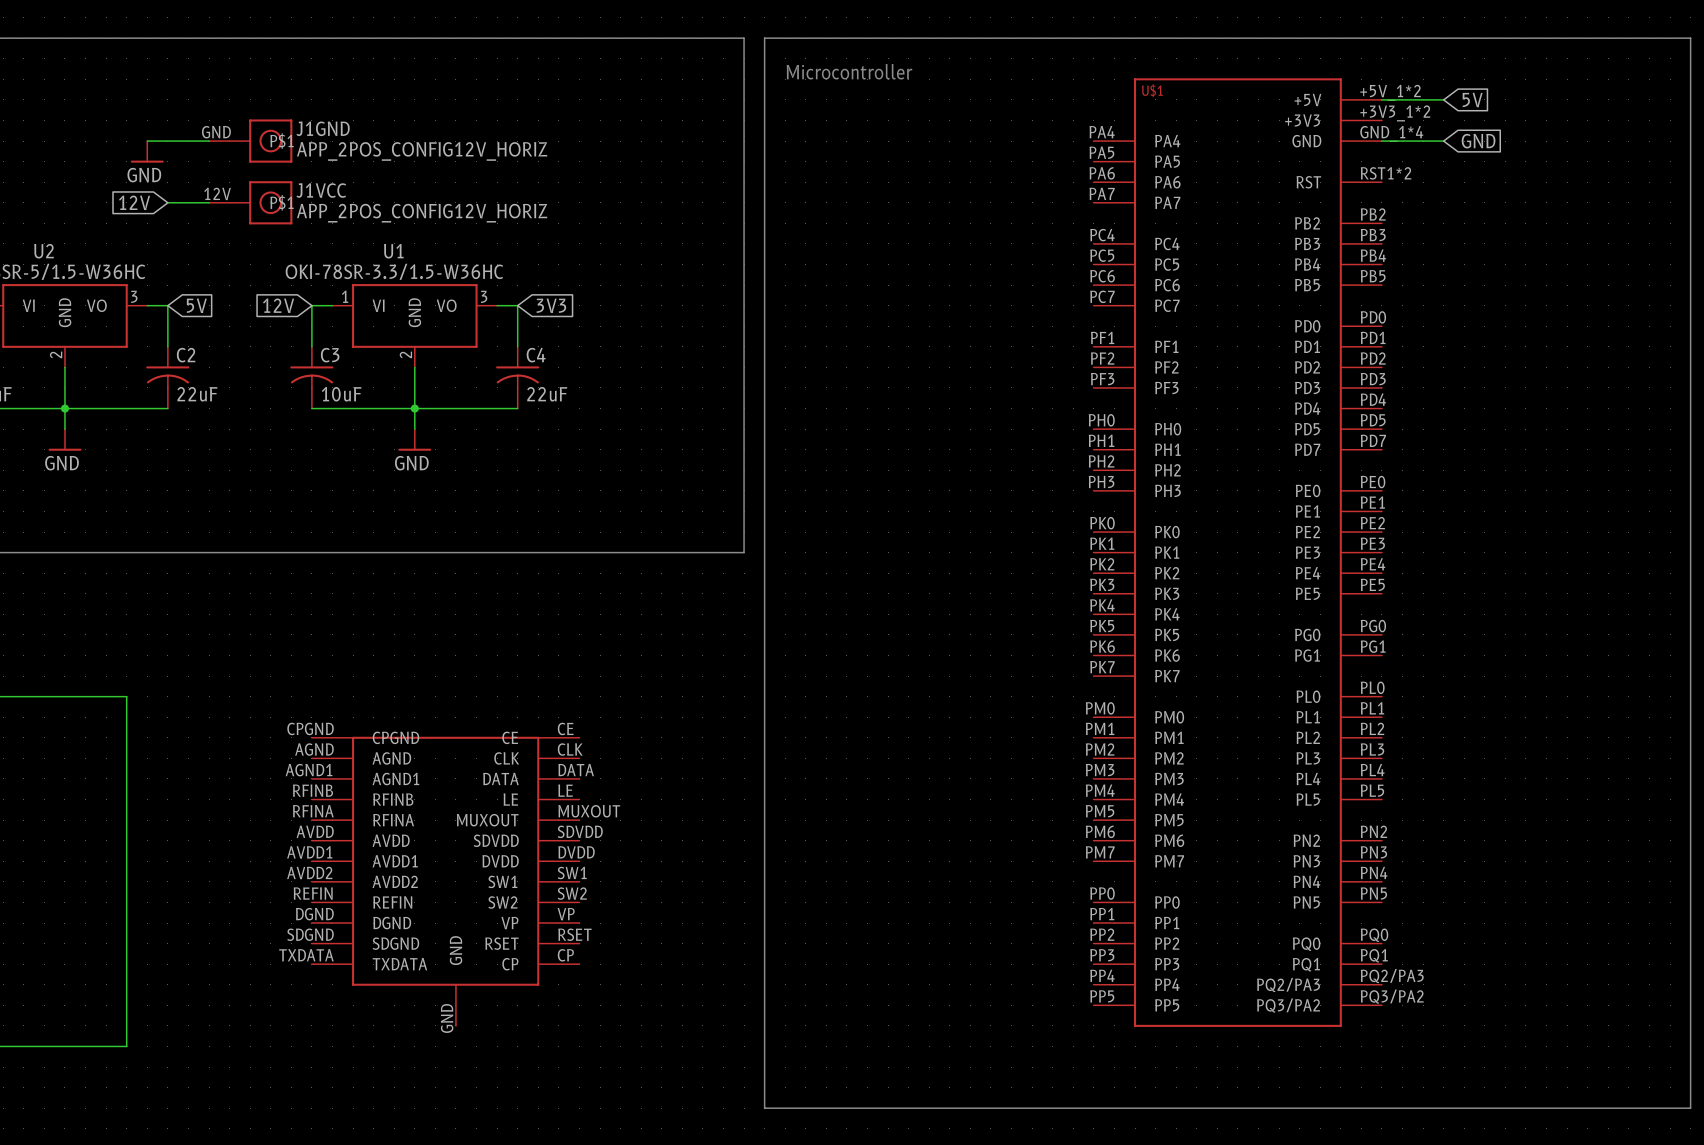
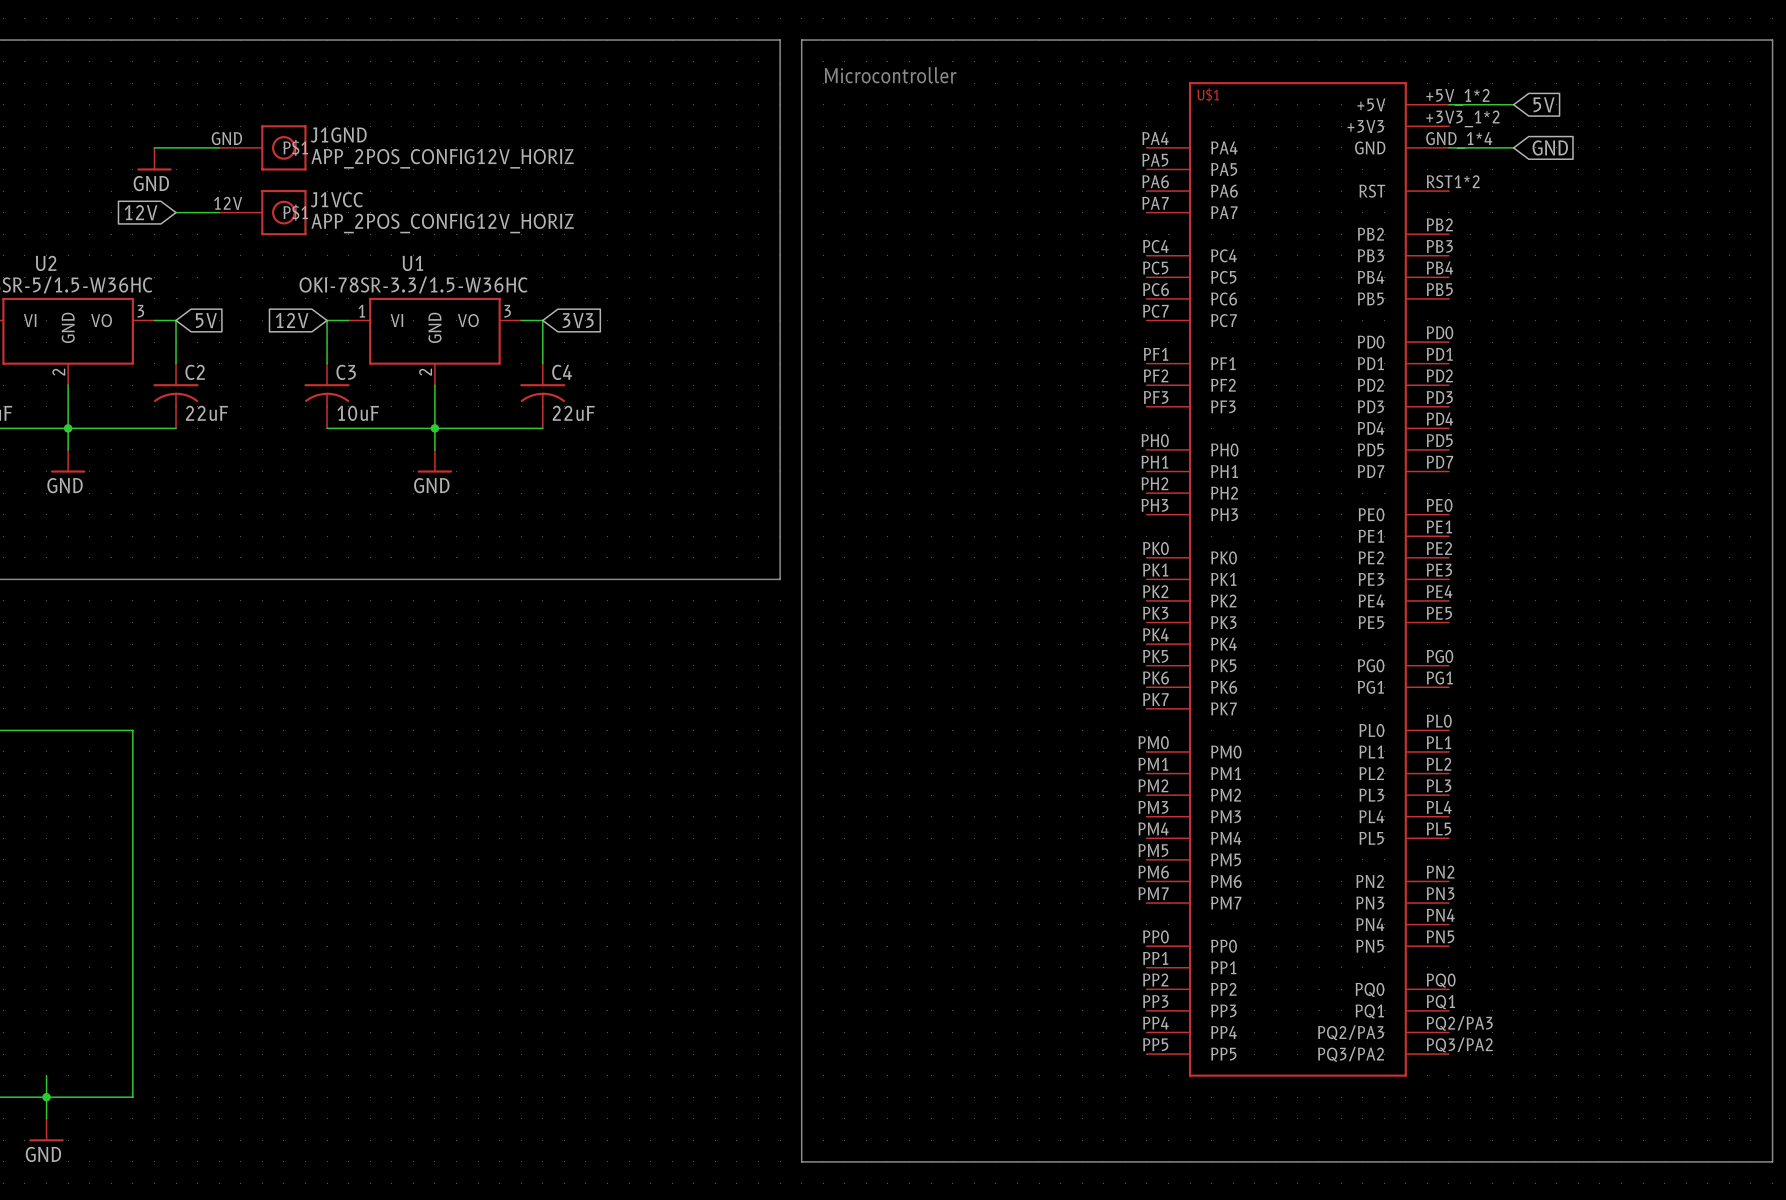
part: (445, 881) -> none
wire: none -> (46, 1075) (46, 1118)
junction: none -> (46, 1097)
power symbol: none -> GND (46, 1130)

